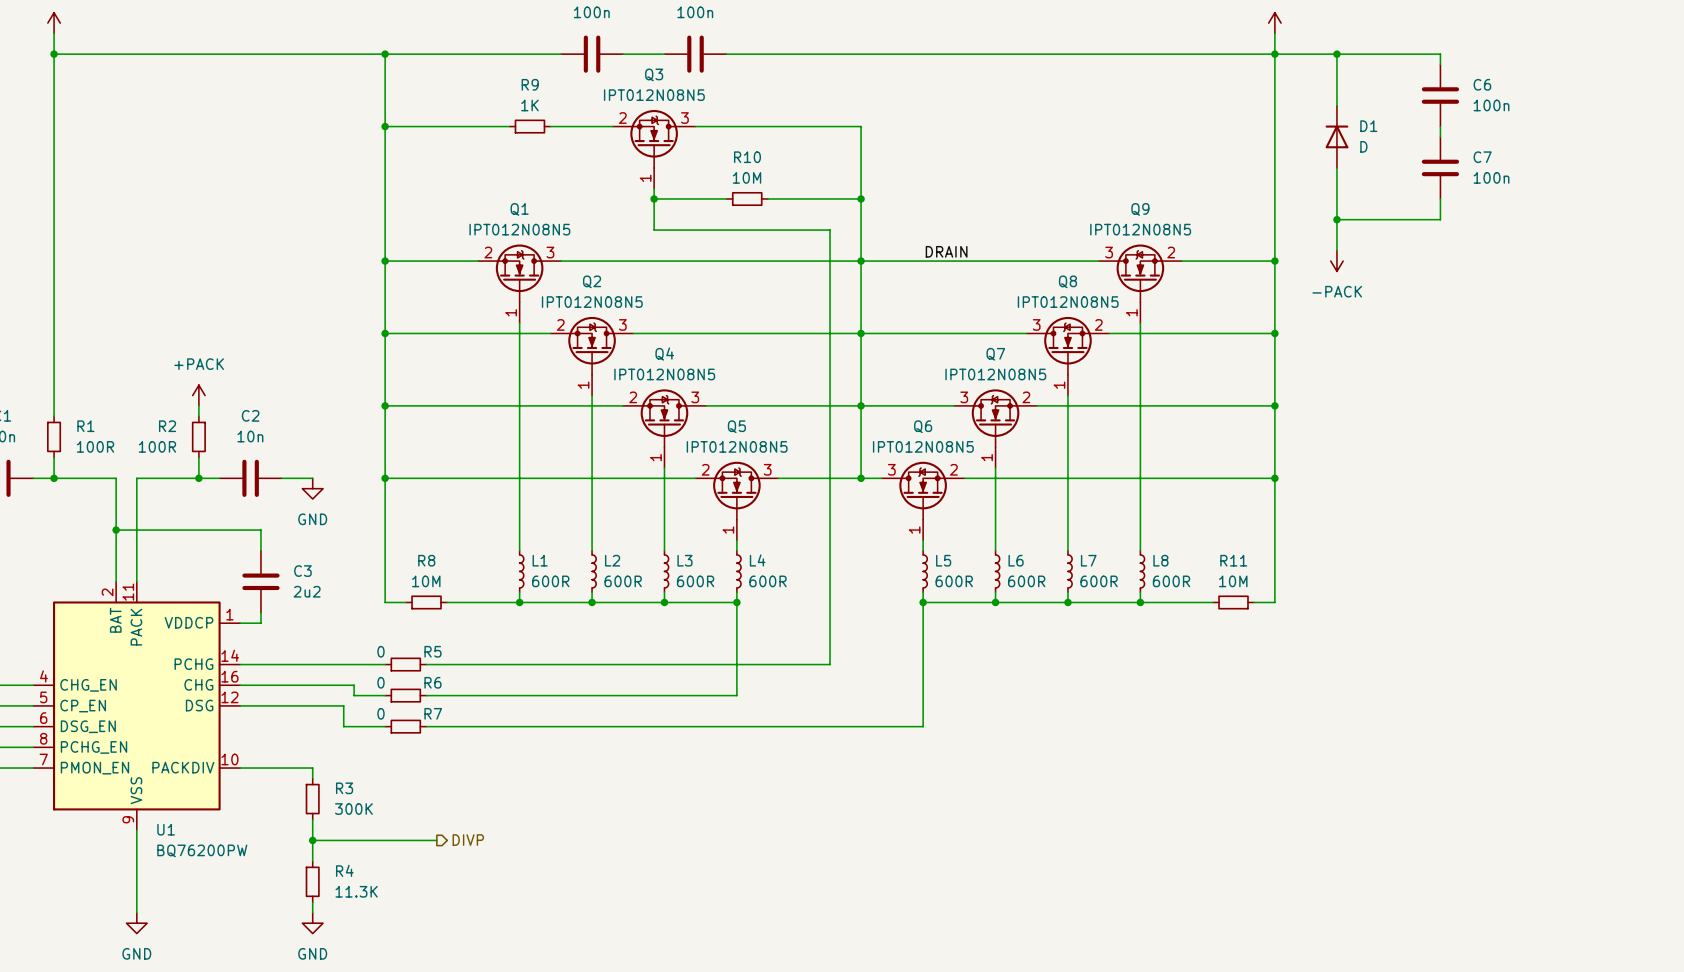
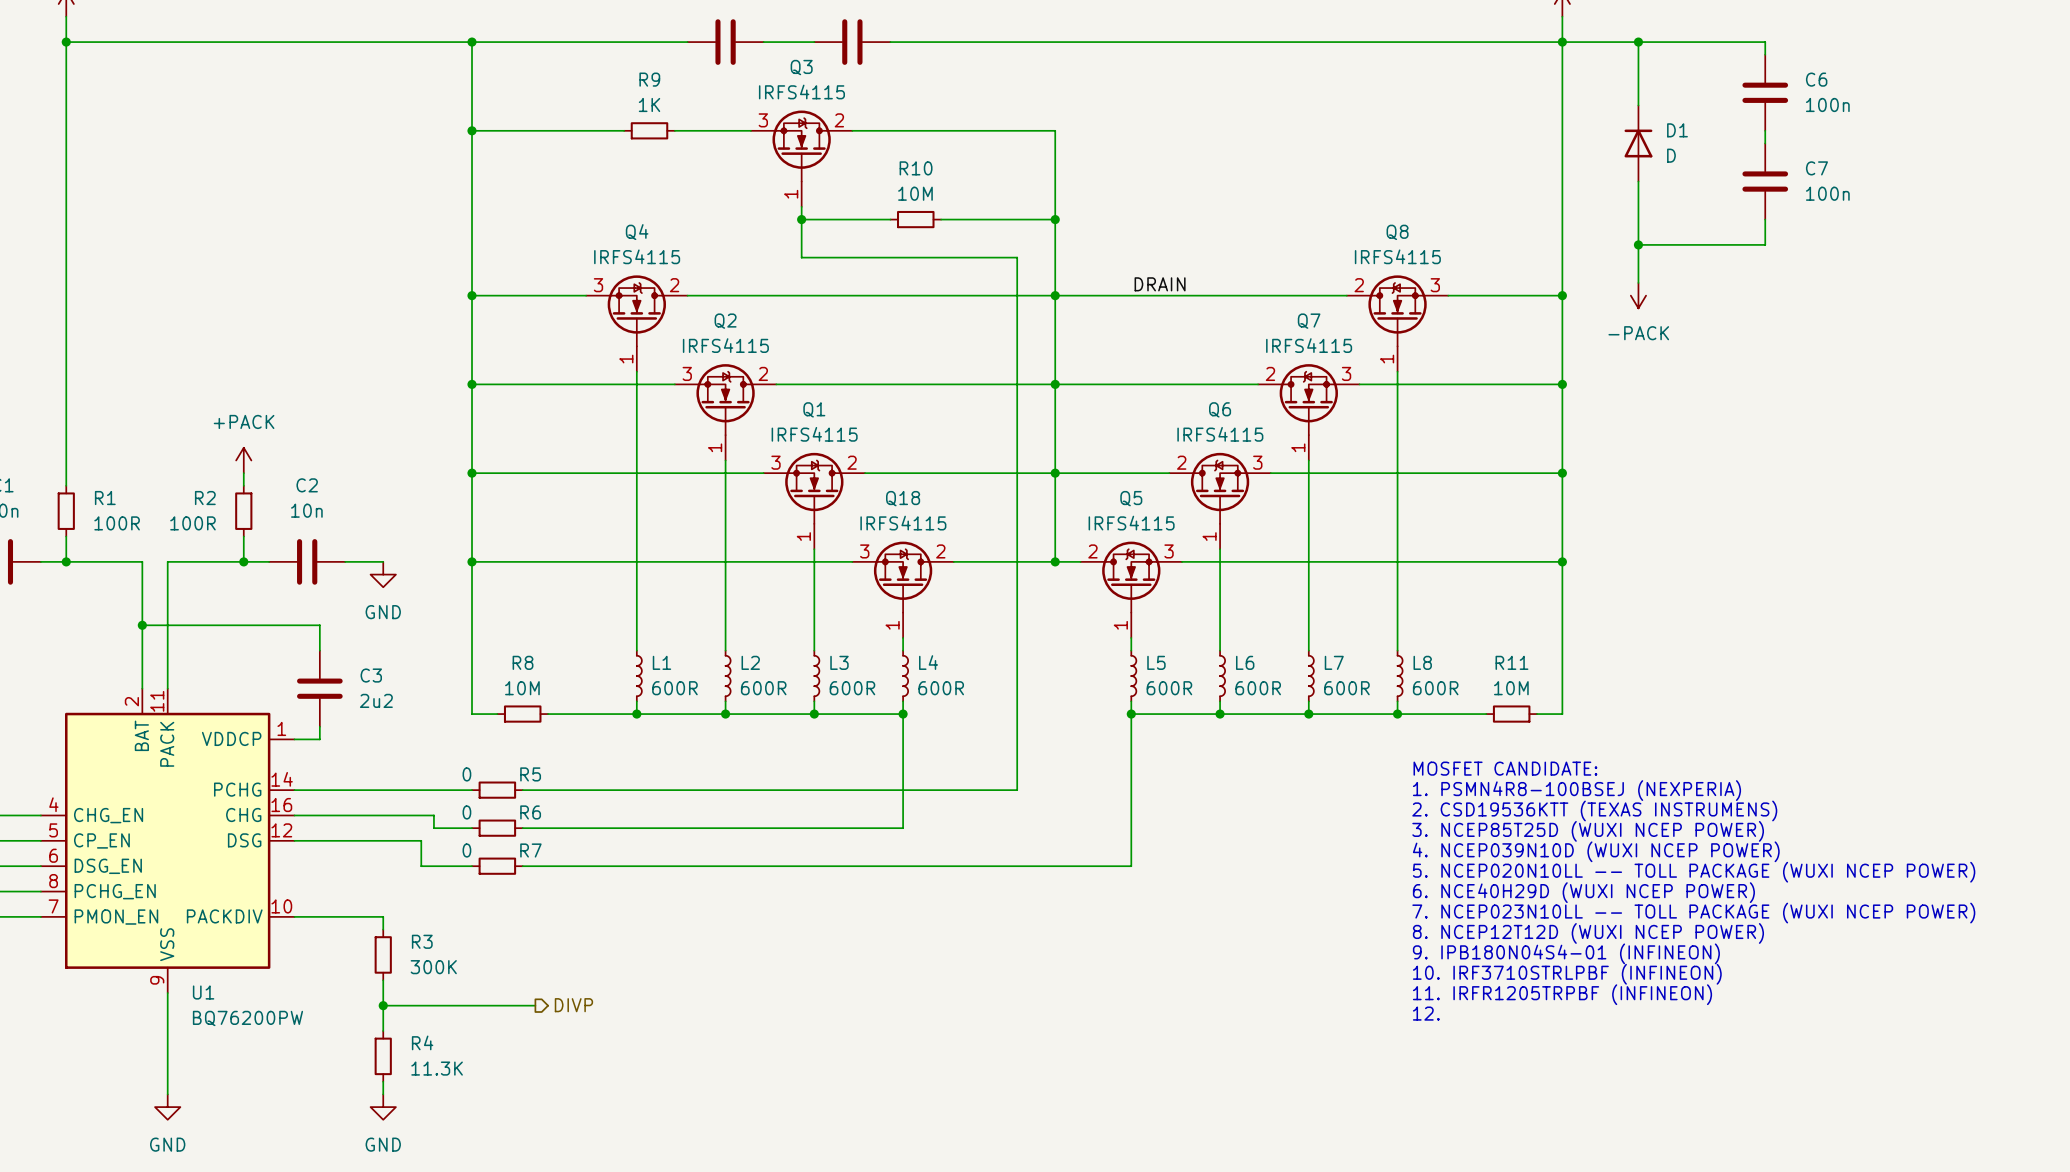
Q3 value: IPT012N08N5 (654, 95) -> IRFS4115 (801, 92)
Q3 pin number: 2 (622, 118) -> 3 (763, 120)
Q3 pin number: 3 (684, 118) -> 2 (839, 120)
Q1 value: IPT012N08N5 (519, 229) -> IRFS4115 (814, 434)
Q1 pin number: 2 (488, 252) -> 3 (775, 462)
Q1 pin number: 3 (550, 252) -> 2 (852, 462)
Q1 position: (519, 283) -> (814, 501)
Q9: IPT012N08N5 (1140, 283) -> none
Q2 value: IPT012N08N5 (592, 302) -> IRFS4115 (725, 345)
Q8 value: IPT012N08N5 (1068, 302) -> IRFS4115 (1397, 256)
Q2 pin number: 2 (560, 324) -> 3 (687, 373)
Q2 pin number: 3 (622, 324) -> 2 (763, 373)
Q8 pin number: 3 (1036, 324) -> 2 (1359, 285)
Q8 pin number: 2 (1098, 324) -> 3 (1435, 285)
Q8 position: (1067, 356) -> (1397, 323)
Q4 value: IPT012N08N5 (664, 374) -> IRFS4115 (637, 256)
Q7 value: IPT012N08N5 (995, 374) -> IRFS4115 (1309, 345)
Q4 pin number: 2 (633, 397) -> 3 (598, 285)
Q4 pin number: 3 (695, 397) -> 2 (674, 285)
Q7 pin number: 3 (964, 397) -> 2 (1270, 373)
Q7 pin number: 2 (1026, 397) -> 3 (1346, 373)
Q4 position: (664, 428) -> (636, 323)
Q7 position: (995, 428) -> (1308, 412)
Q5 value: IPT012N08N5 (737, 446) -> IRFS4115 (1131, 523)
Q6 value: IPT012N08N5 (923, 446) -> IRFS4115 (1220, 434)
Q5 symbol: [695, 461, 779, 541] -> [1080, 541, 1183, 638]
Q6 pin number: 3 (891, 469) -> 2 (1181, 462)
Q6 pin number: 2 (953, 469) -> 3 (1257, 462)
Q18: none -> IRFS4115 (903, 589)
Q6 position: (923, 501) -> (1220, 501)
text: none -> MOSFET CANDIDATE: (1505, 768)
text: none -> 1. PSMN4R8-100BSEJ (NEXPERIA) (1576, 790)
text: none -> 2. CSD19536KTT (TEXAS INSTRUMENS) (1594, 810)
text: none -> 3. NCEP85T25D (WUXI NCEP POWER) (1588, 831)
text: none -> 4. NCEP039N10D (WUXI NCEP POWER) (1596, 851)
text: none -> 5. NCEP020N10LL -- TOLL PACKAGE (WUXI NCEP POWER) (1694, 872)
text: none -> 6. NCE40H29D (WUXI NCEP POWER) (1583, 892)
text: none -> 7. NCEP023N10LL -- TOLL PACKAGE (WUXI NCEP POWER) (1693, 913)
text: none -> 8. NCEP12T12D (WUXI NCEP POWER) (1588, 933)
text: none -> 9. IPB180N04S4-01 (INFINEON) (1566, 953)
text: none -> 10. IRF3710STRLPBF (INFINEON) (1567, 974)
text: none -> 11. IRFR1205TRPBF (INFINEON) (1562, 994)
text: none -> 12. (1426, 1013)

